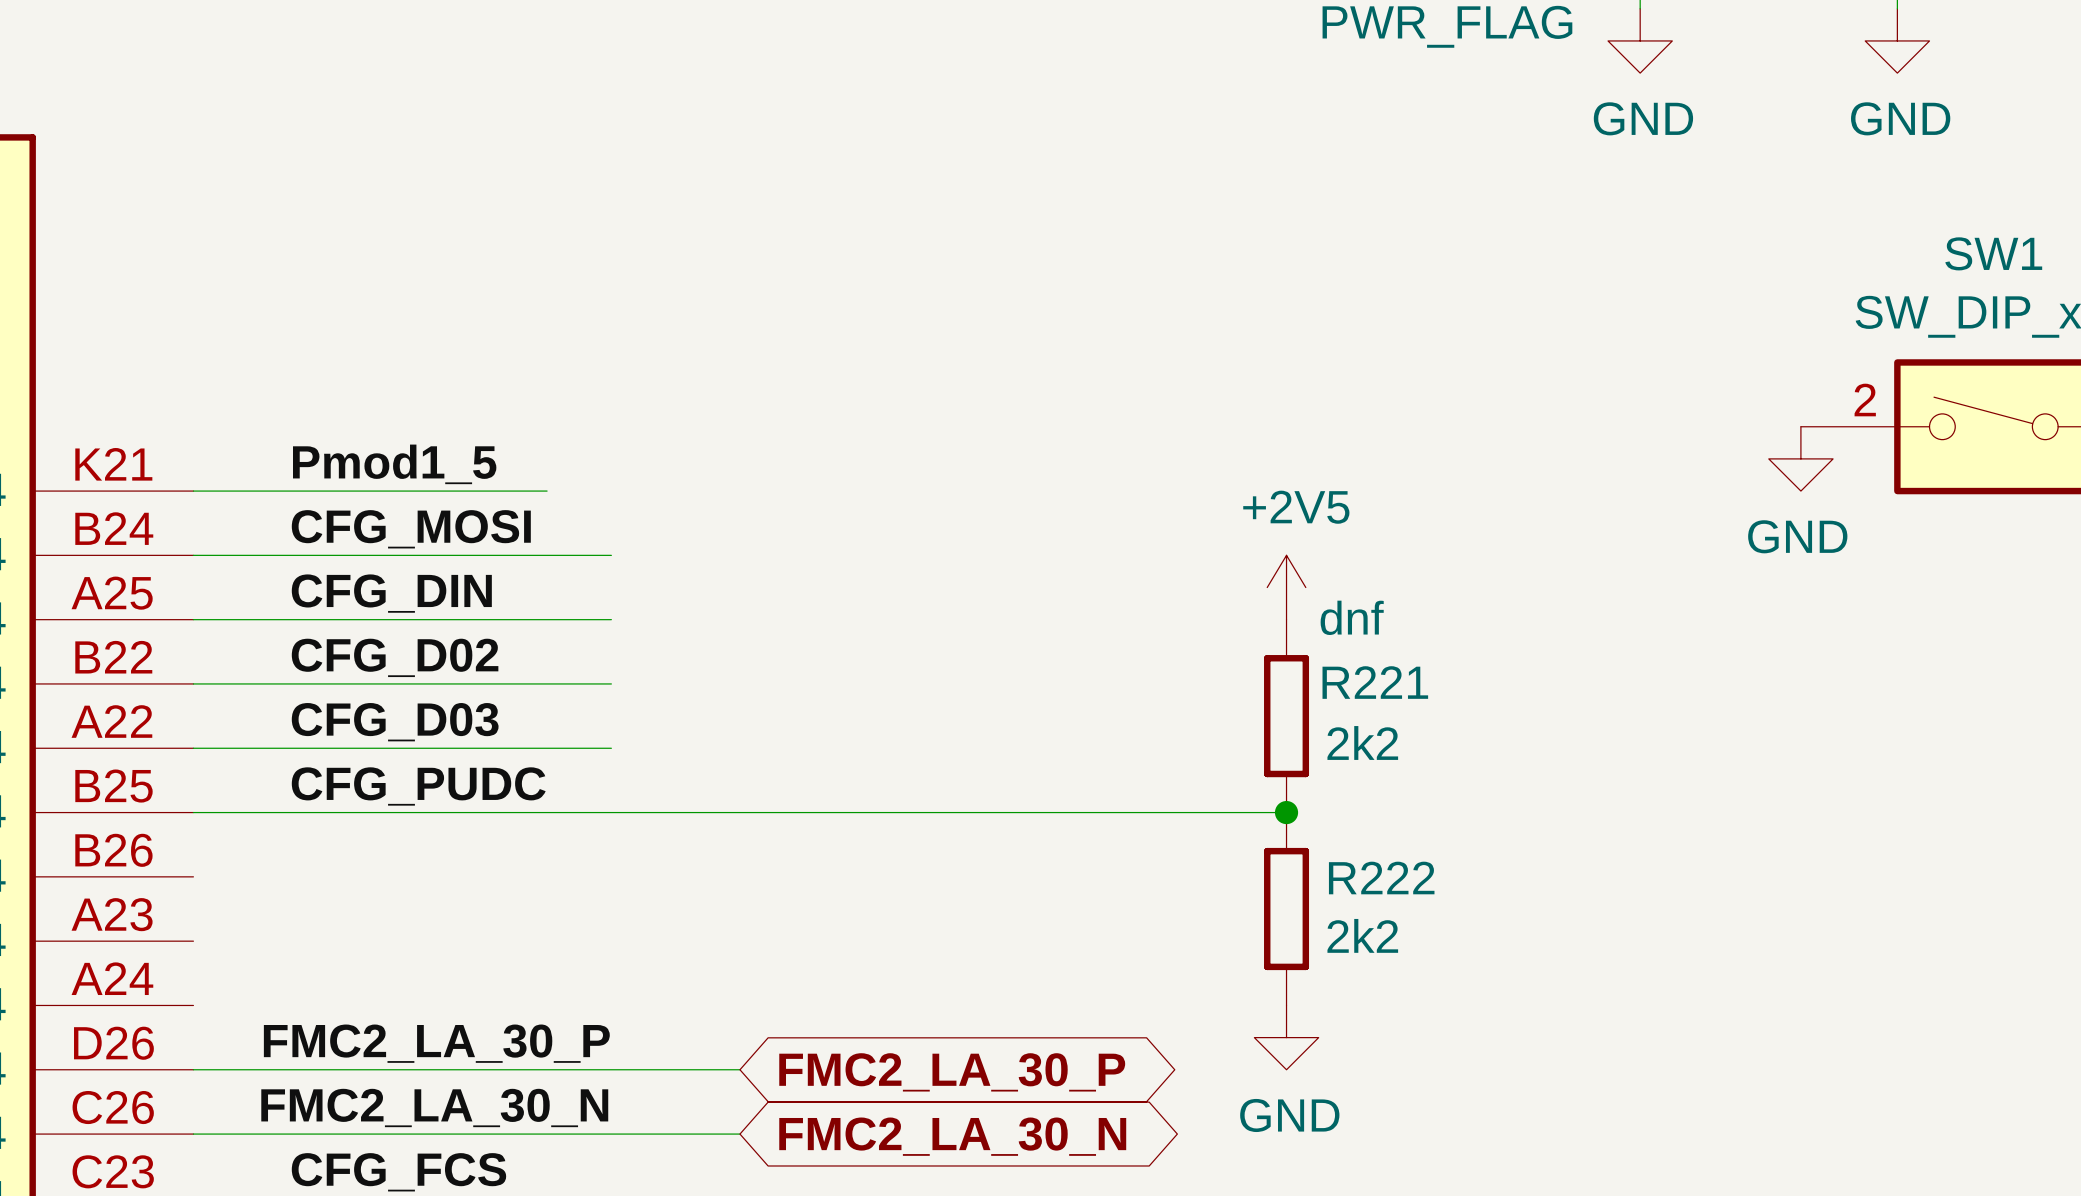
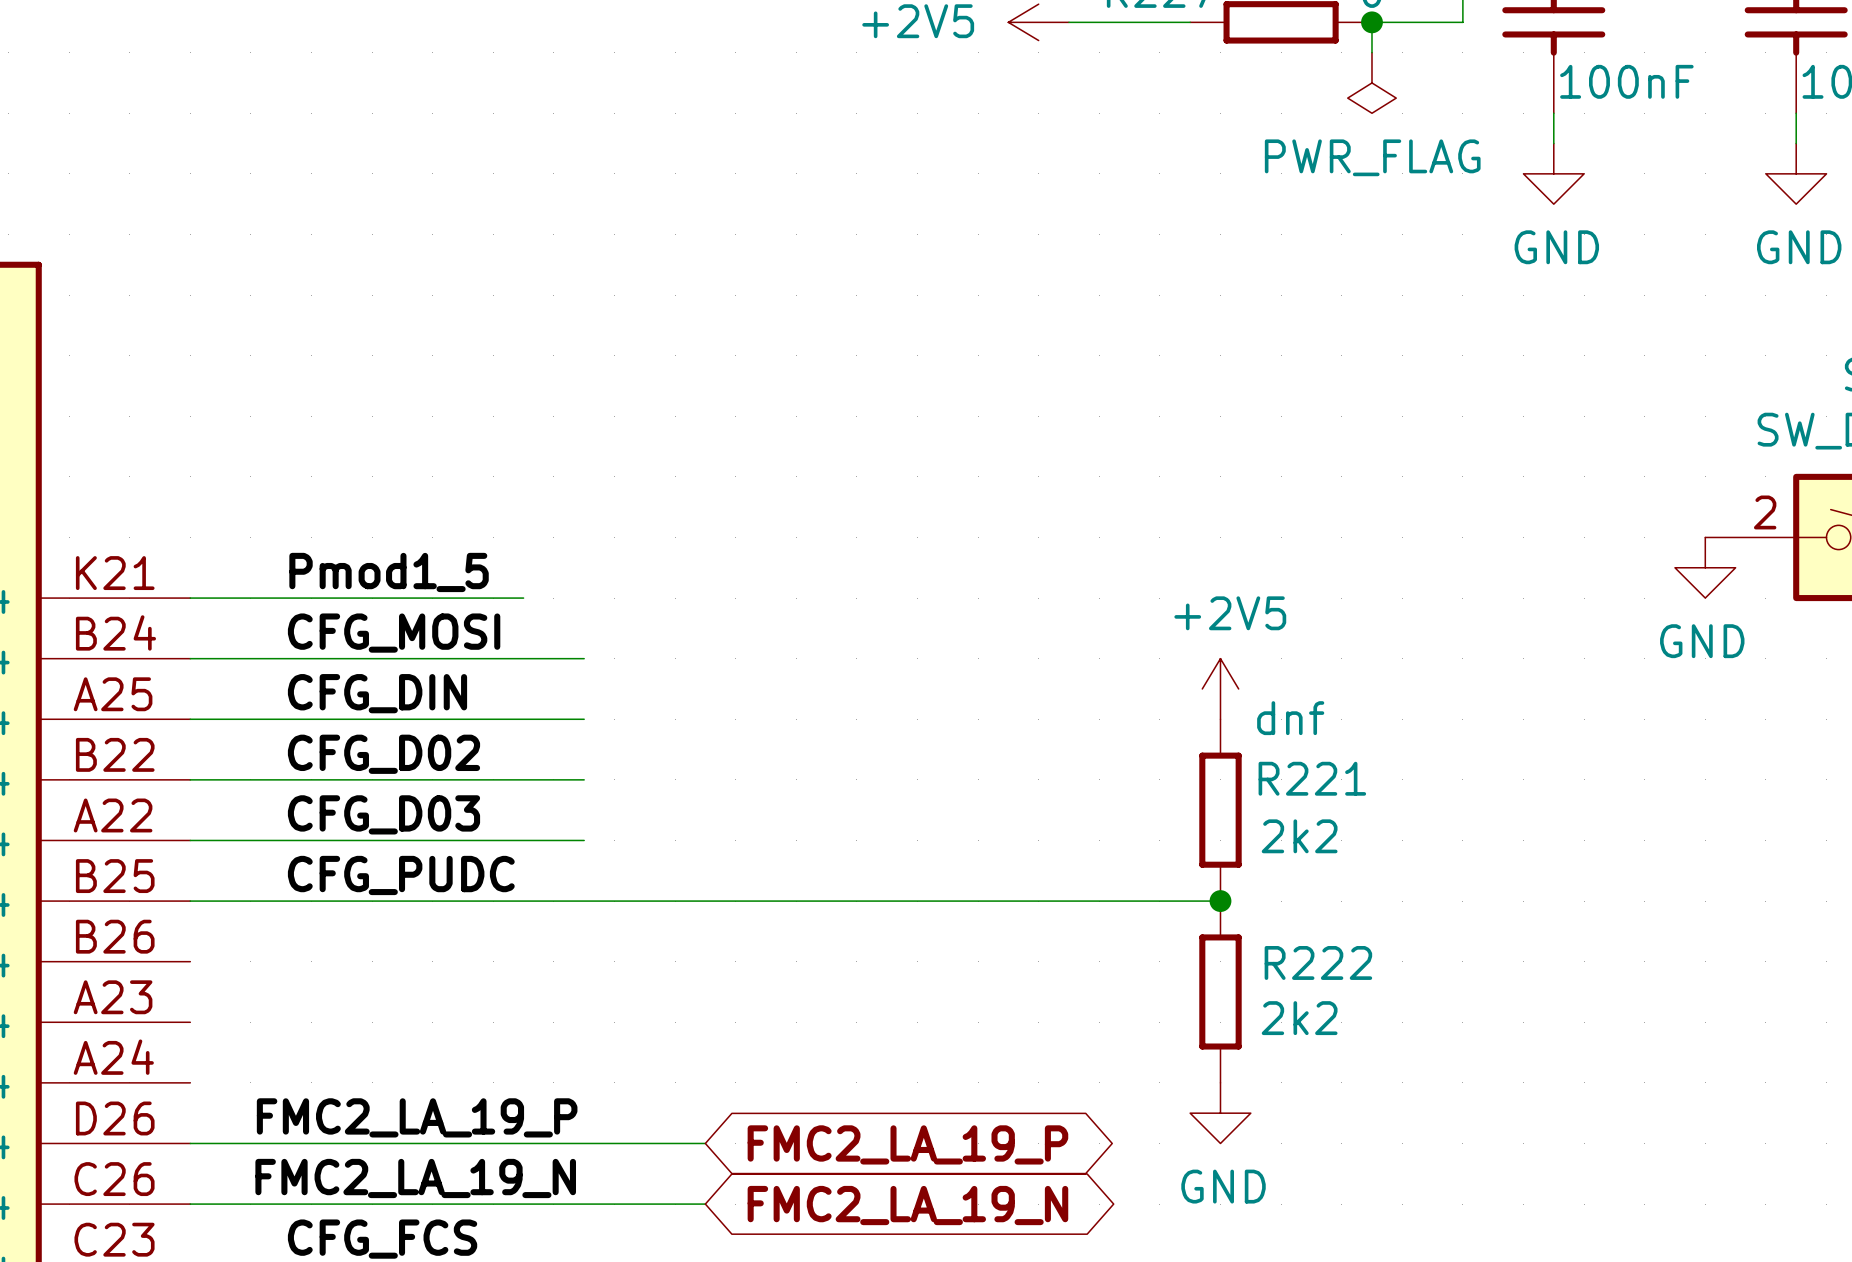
label: FMC2_LA_30_P (436, 1043) -> FMC2_LA_19_P (417, 1117)
global label: FMC2_LA_30_P (952, 1072) -> FMC2_LA_19_P (907, 1144)
label: FMC2_LA_30_N (434, 1107) -> FMC2_LA_19_N (415, 1178)
global label: FMC2_LA_30_N (952, 1136) -> FMC2_LA_19_N (907, 1205)

